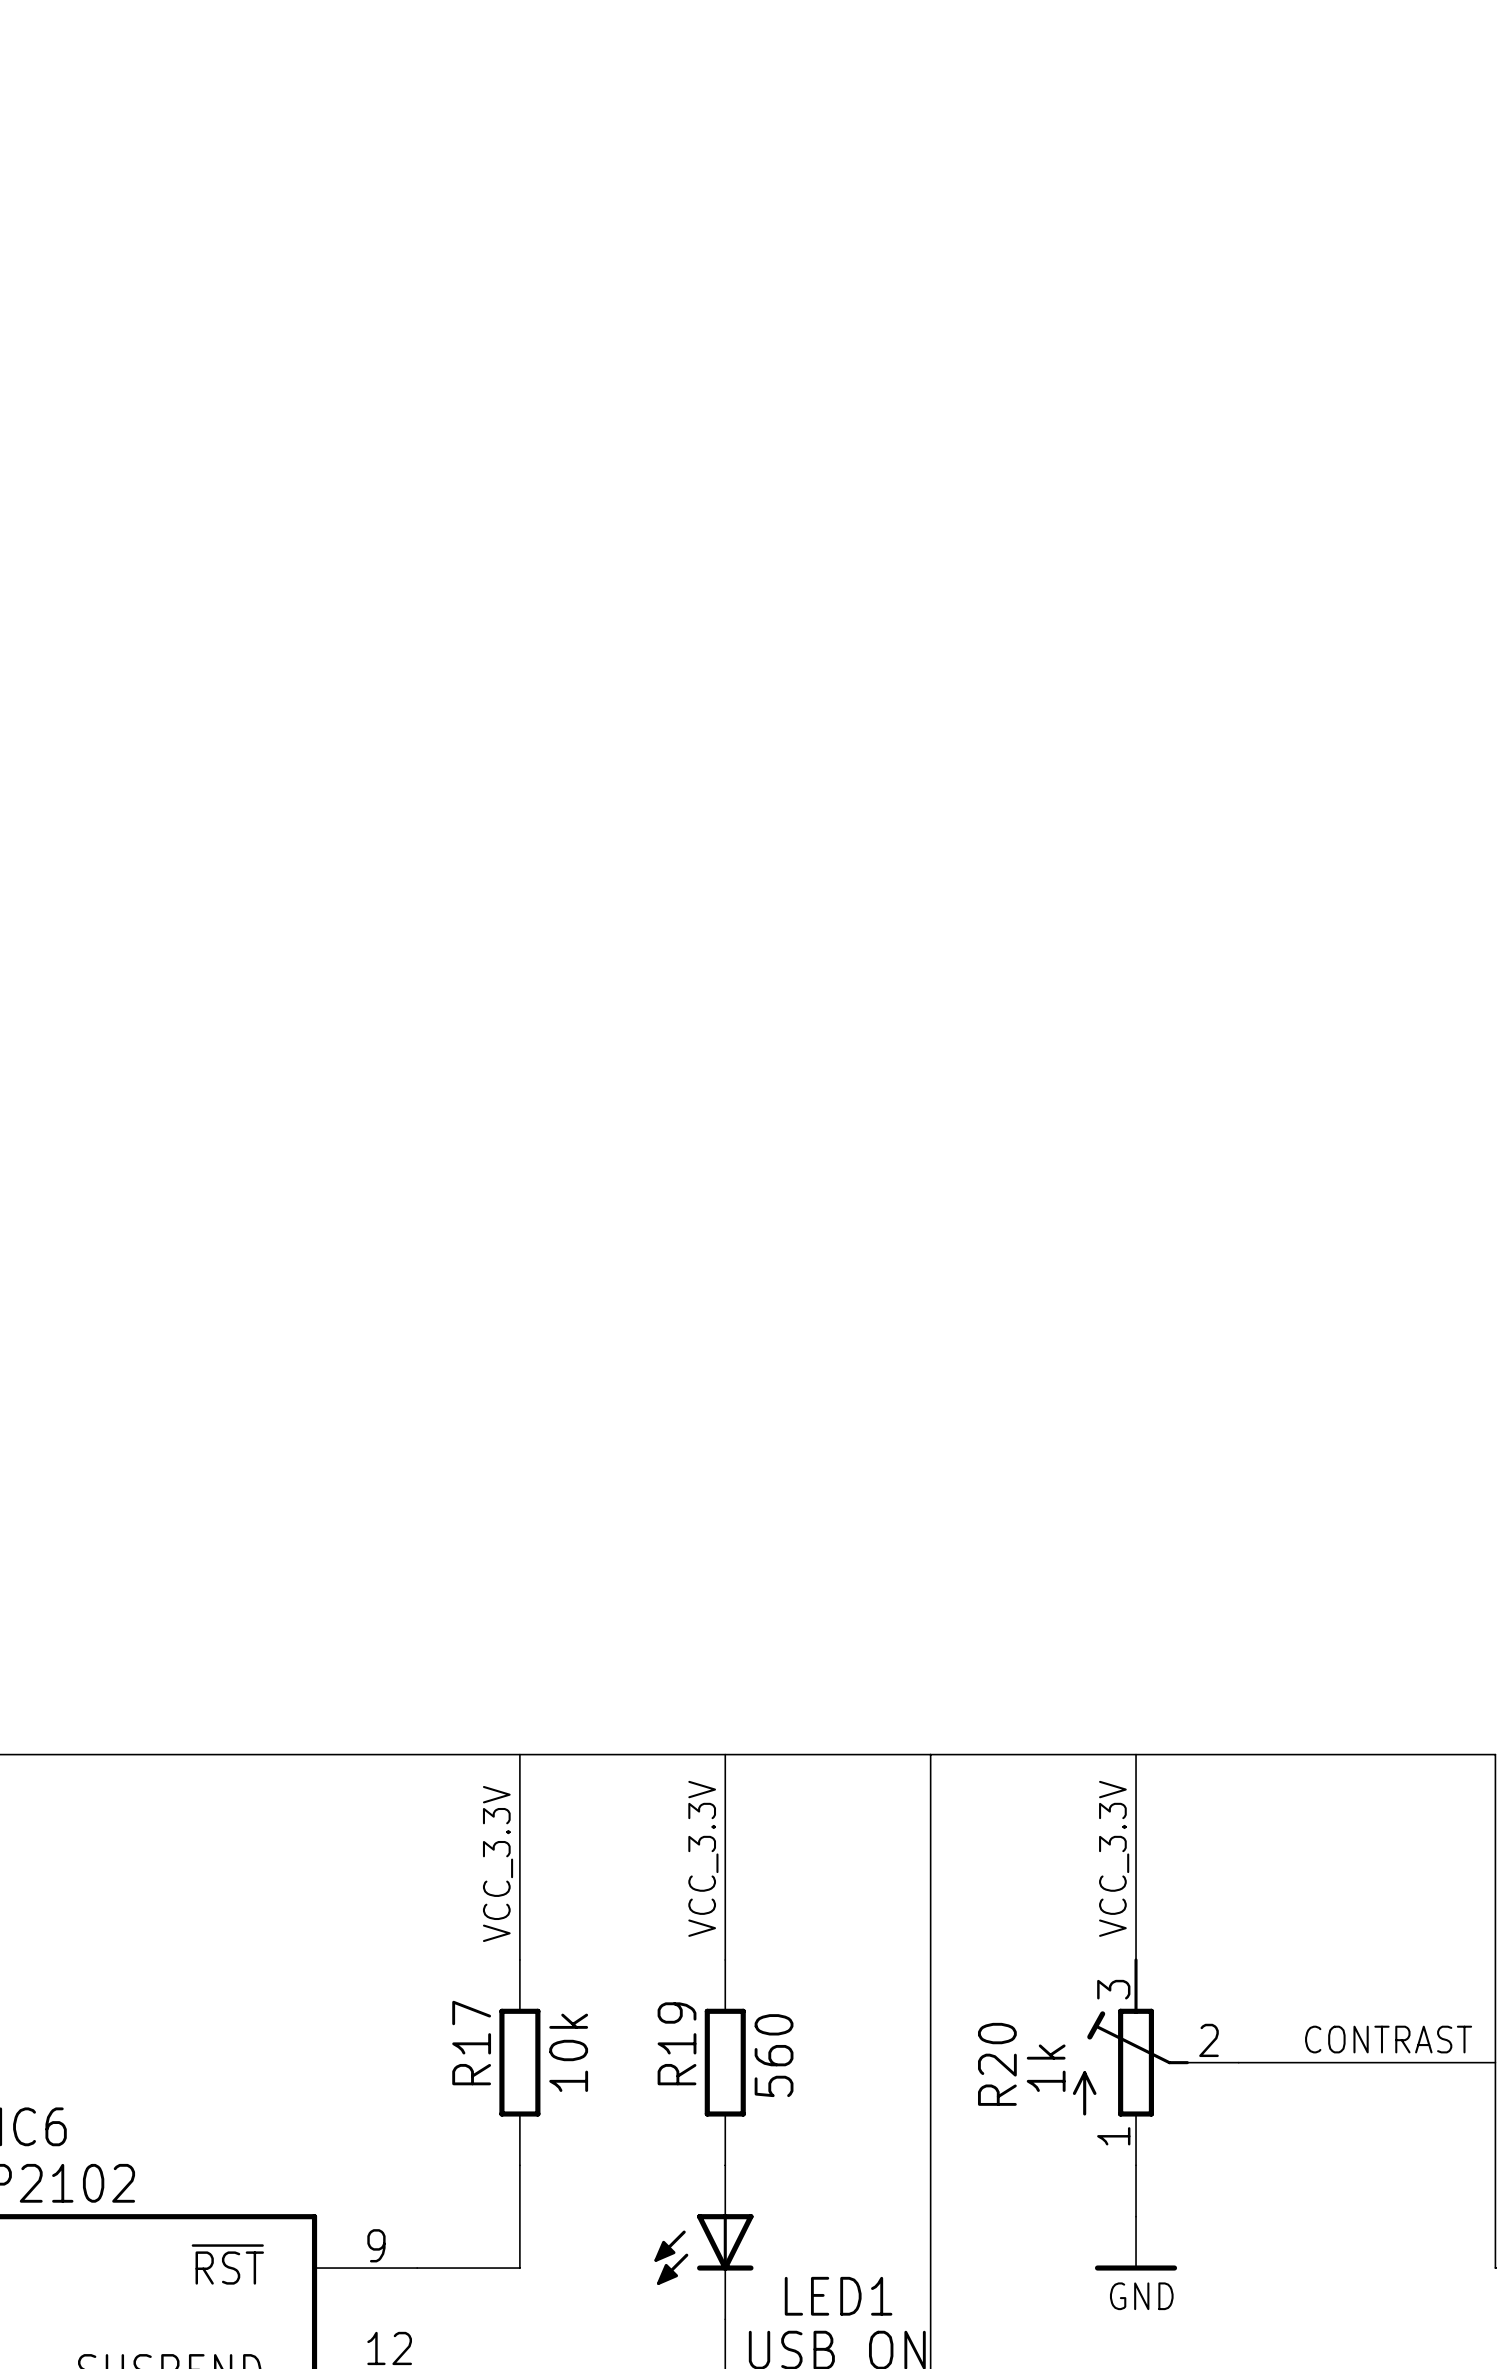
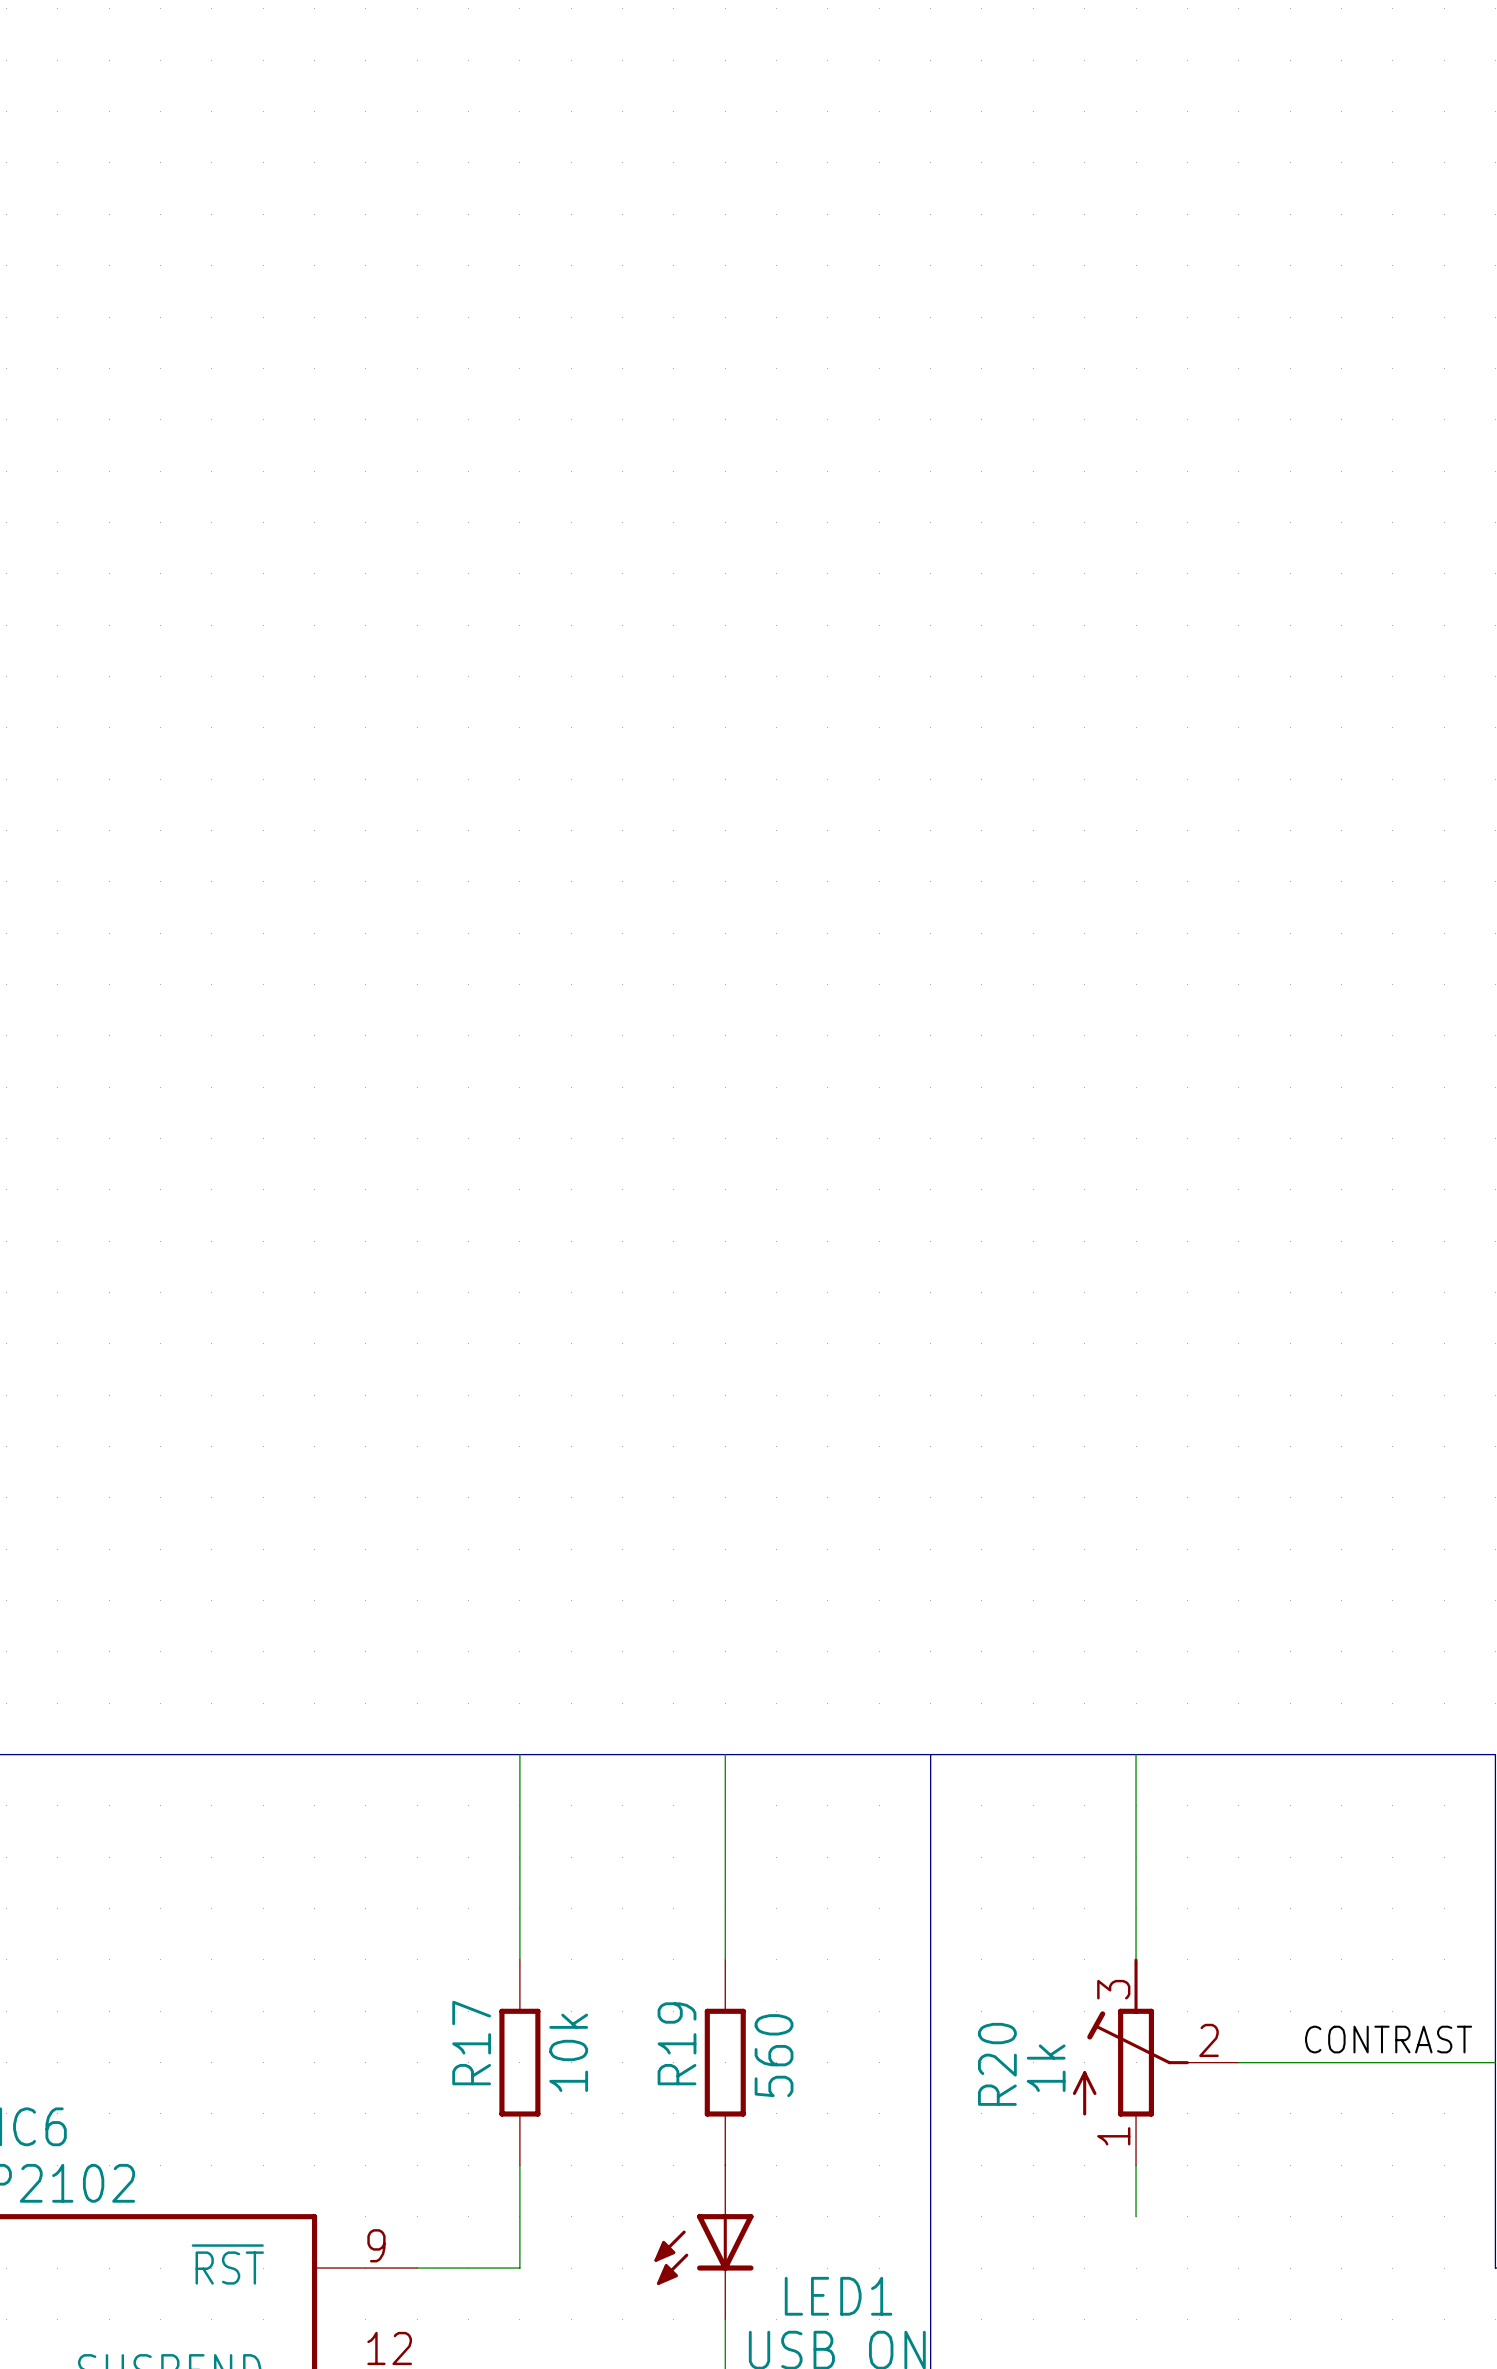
label: VCC_3.3V (703, 1858) -> none
label: VCC_3.3V (1114, 1858) -> none
label: VCC_3.3V (498, 1864) -> none
power symbol: GND (1136, 2243) -> none

